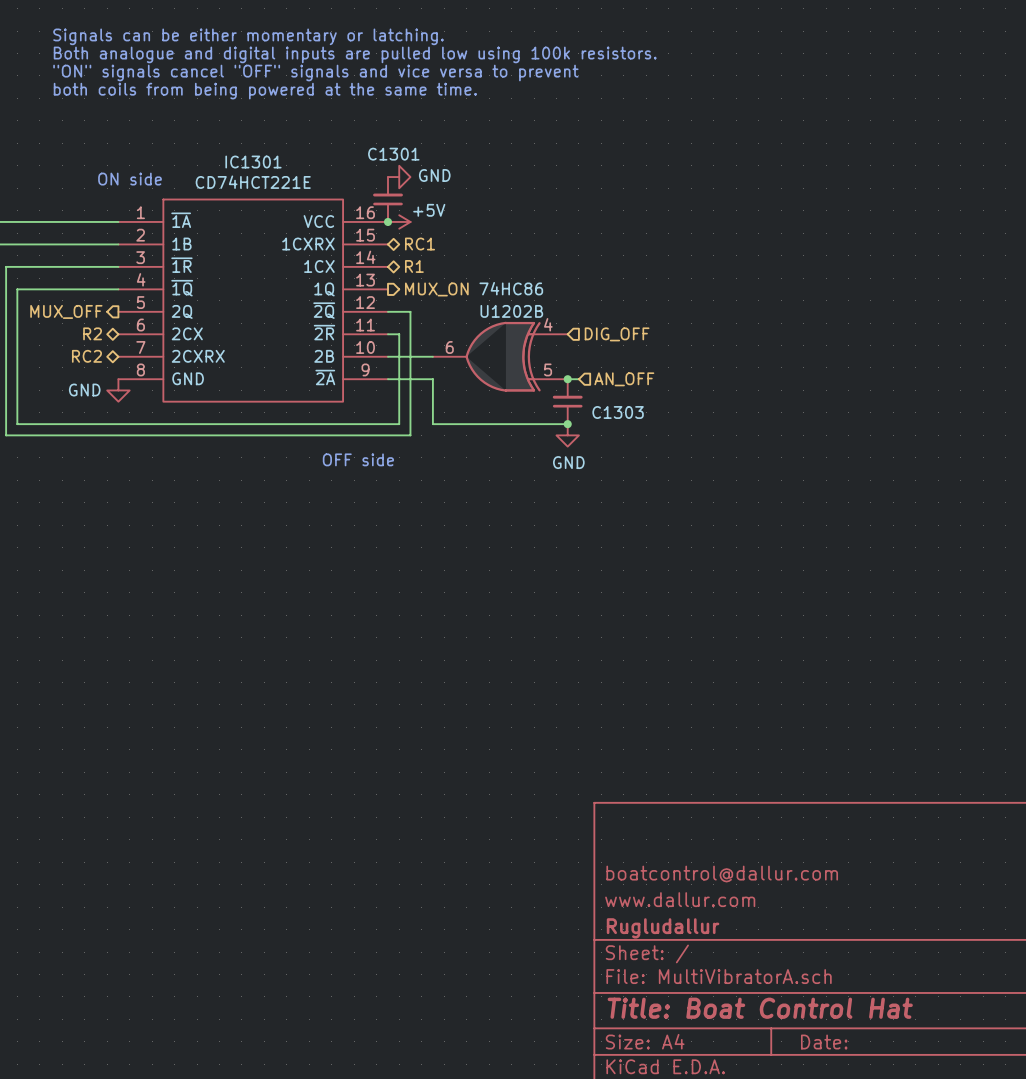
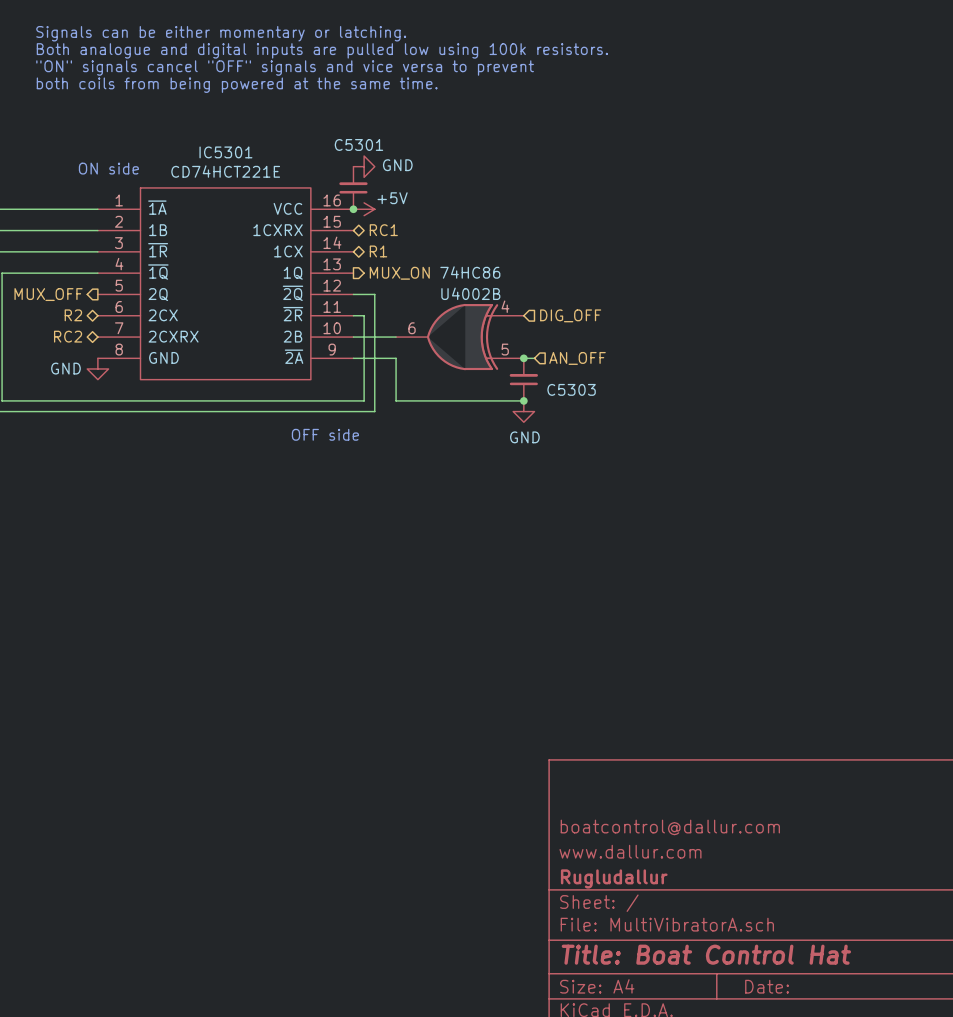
C1301 name: C1301 (393, 154) -> C5301 (358, 144)
IC1301 name: IC1301 (253, 162) -> IC5301 (225, 152)
U1202B name: U1202B (511, 311) -> U4002B (470, 293)
C1303 name: C1303 (618, 412) -> C5303 (571, 389)

